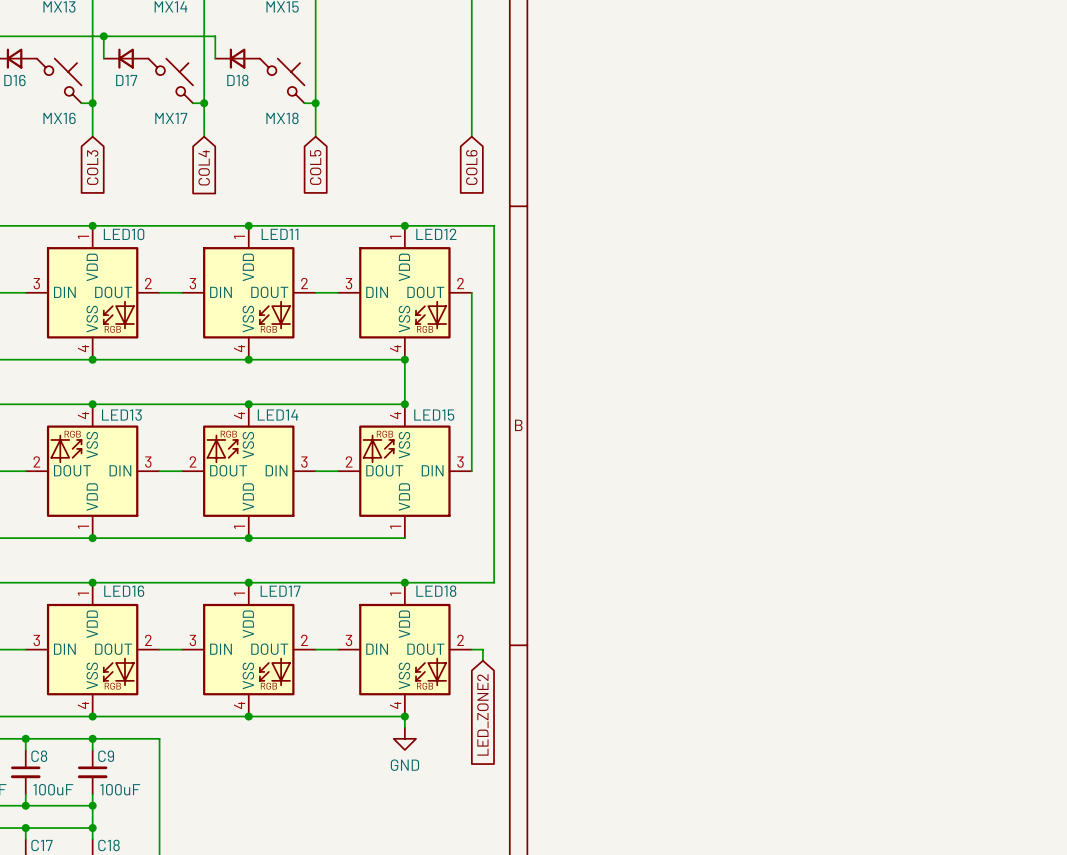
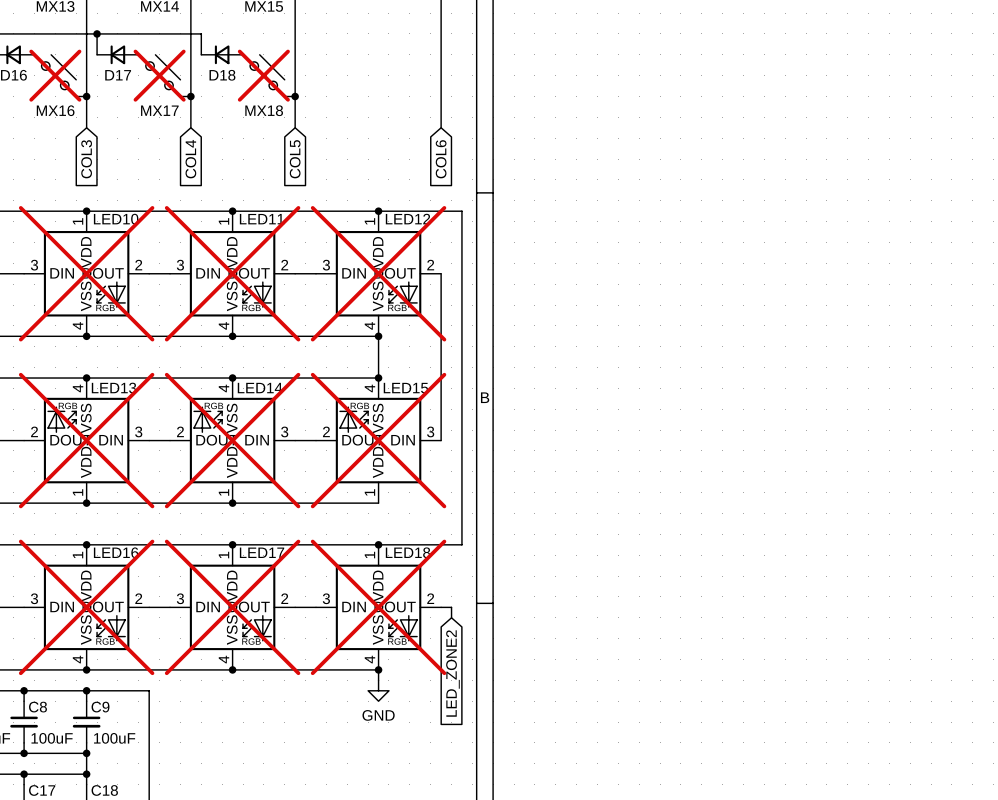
MX16 do-not-place cross: none -> (55, 75)
MX17 do-not-place cross: none -> (159, 75)
MX18 do-not-place cross: none -> (263, 75)
LED10 do-not-place cross: none -> (86, 273)
LED11 do-not-place cross: none -> (232, 273)
LED12 do-not-place cross: none -> (378, 273)
LED13 do-not-place cross: none -> (86, 440)
LED14 do-not-place cross: none -> (232, 440)
LED15 do-not-place cross: none -> (378, 440)
LED16 do-not-place cross: none -> (86, 607)
LED17 do-not-place cross: none -> (232, 607)
LED18 do-not-place cross: none -> (378, 607)

